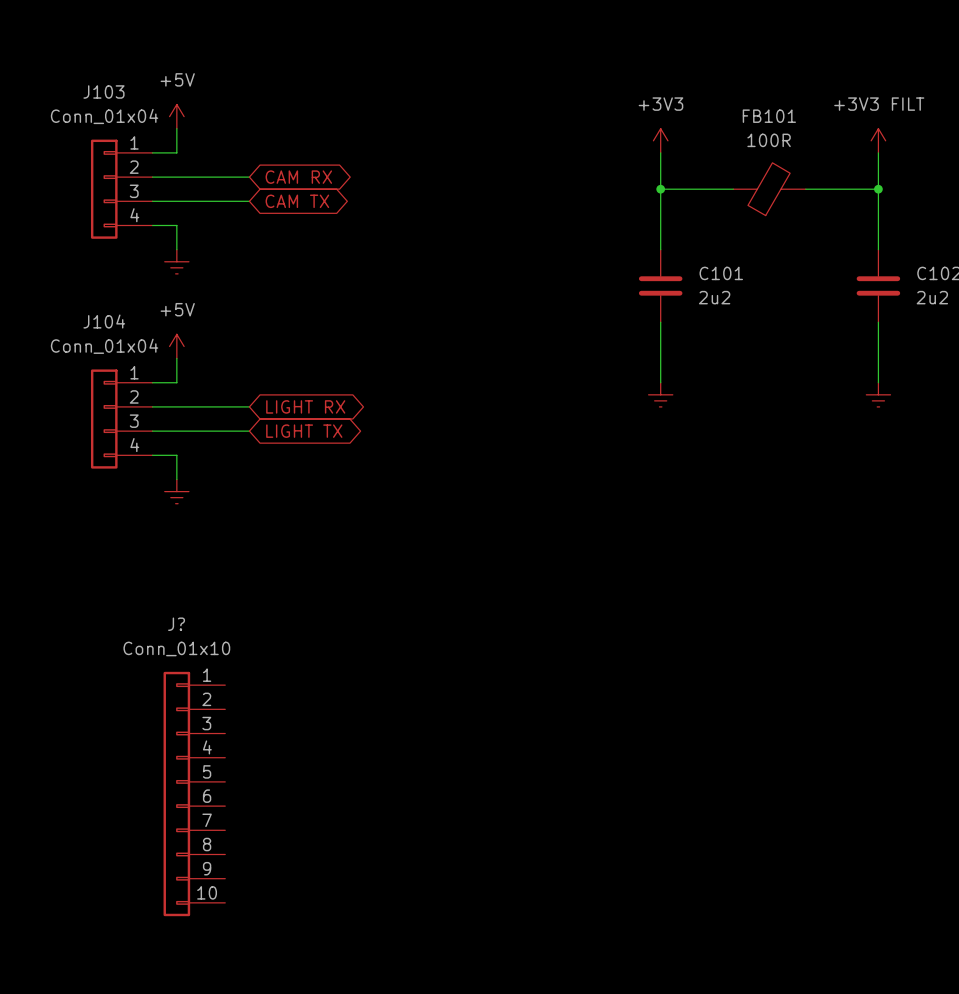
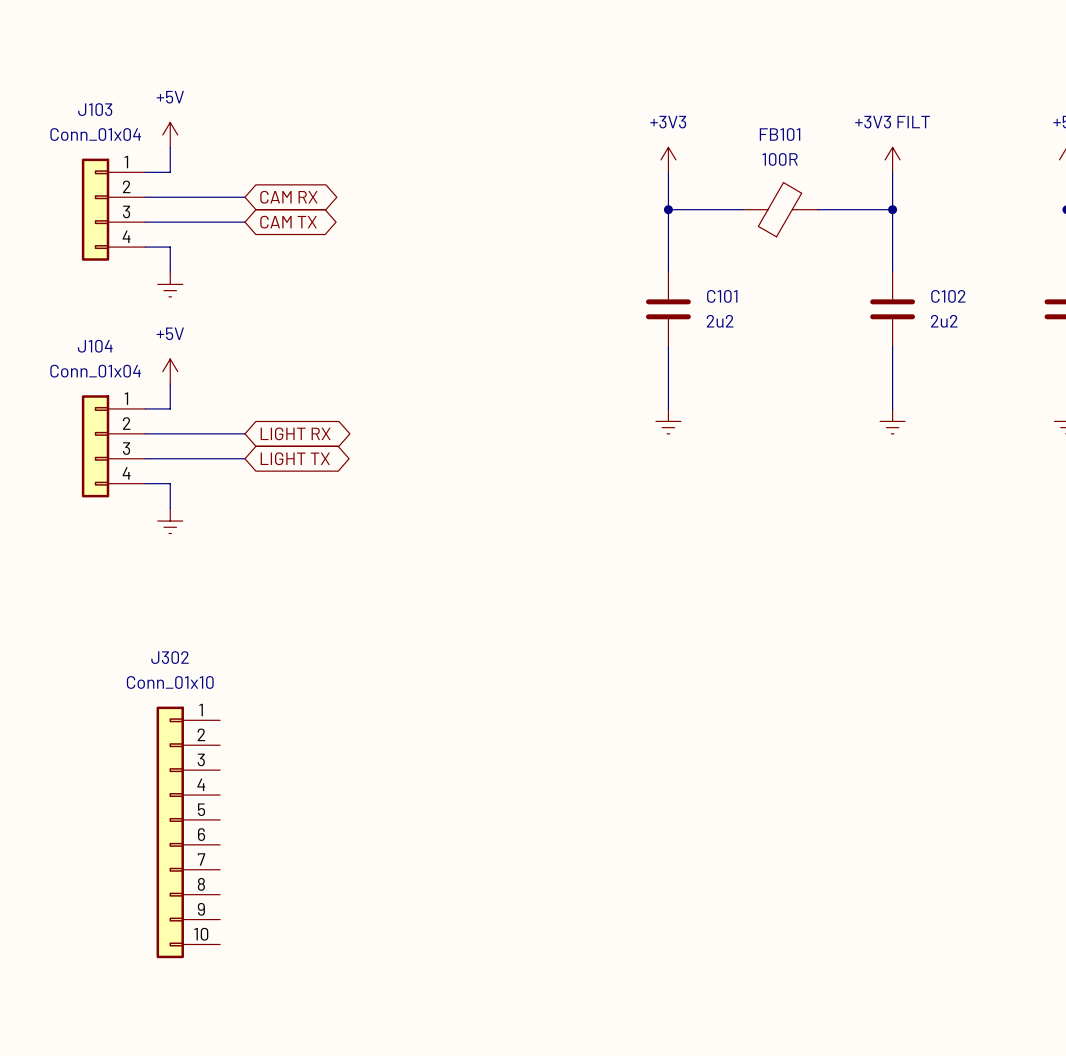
J? name: J? (176, 624) -> J302 (170, 657)

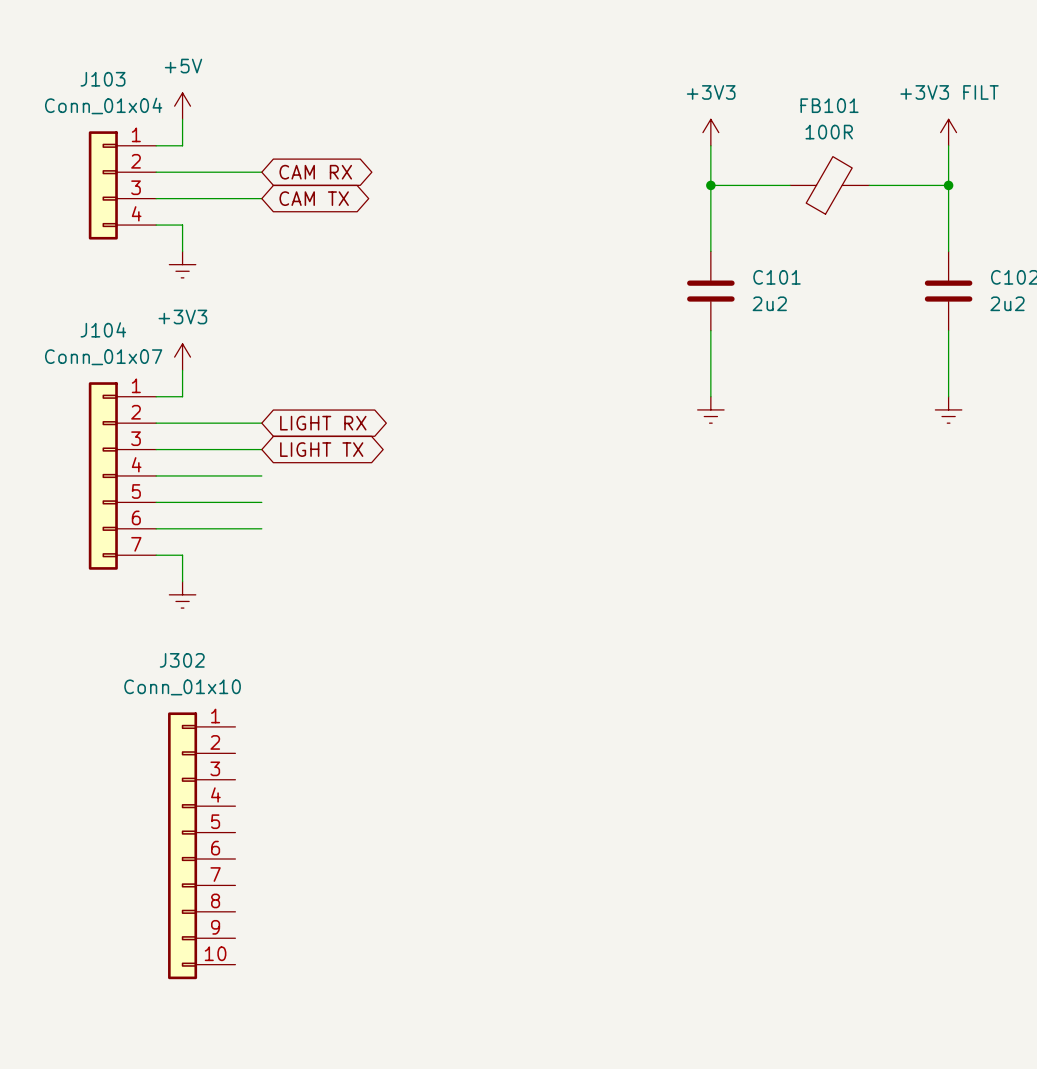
J104 value: Conn_01x04 (95, 371) -> Conn_01x07 (103, 357)
power symbol: +5V (170, 371) -> +3V3 (182, 357)
J104 symbol: [81, 395, 146, 498] -> [88, 382, 157, 570]
wire: (170, 483) (170, 508) -> (182, 475) (261, 475)
wire: none -> (156, 502) (261, 502)
power symbol position: (170, 521) -> (182, 594)
wire: none -> (156, 528) (261, 528)
wire: none -> (156, 555) (182, 555) (182, 581)

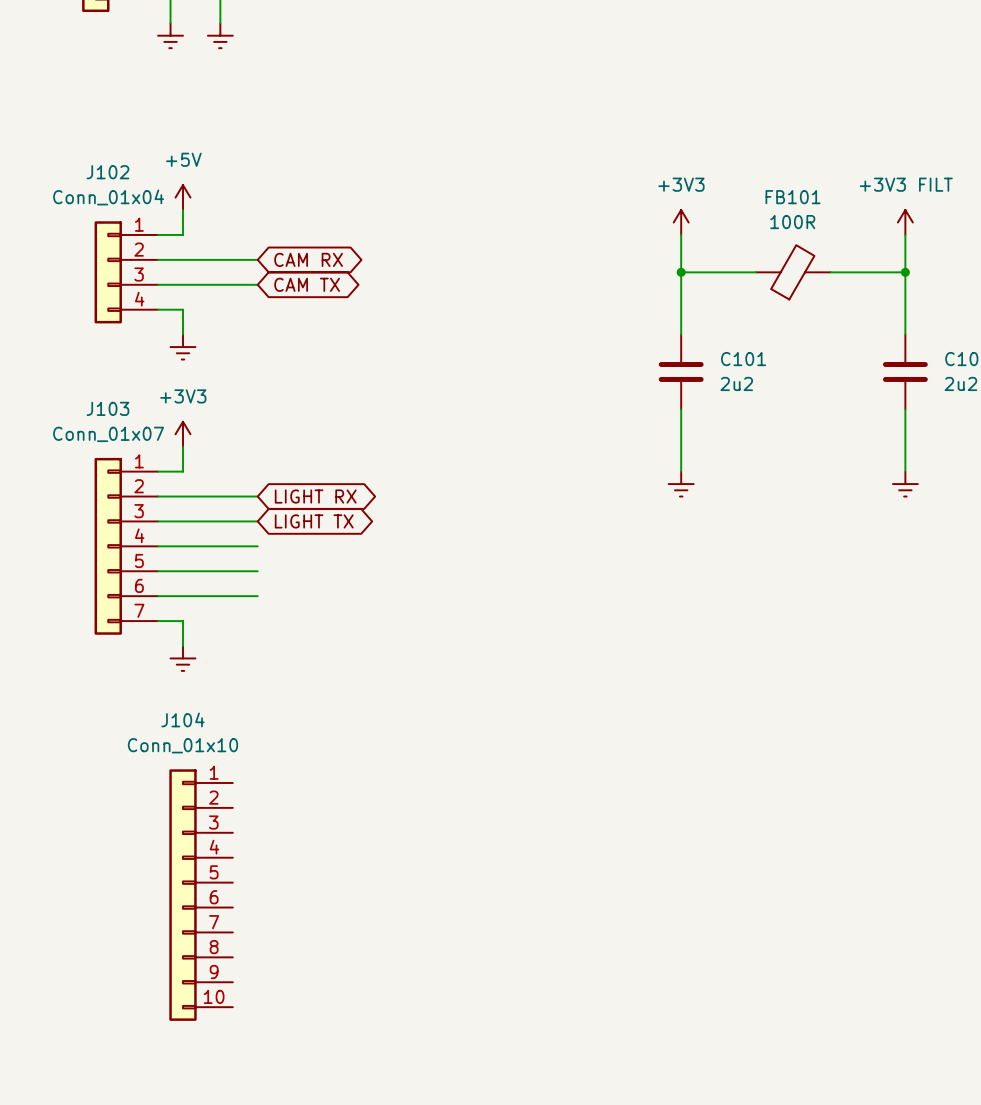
J103 name: J103 (103, 79) -> J102 (107, 172)
J104 name: J104 (103, 329) -> J103 (107, 408)
J302 name: J302 (182, 660) -> J104 (182, 719)

